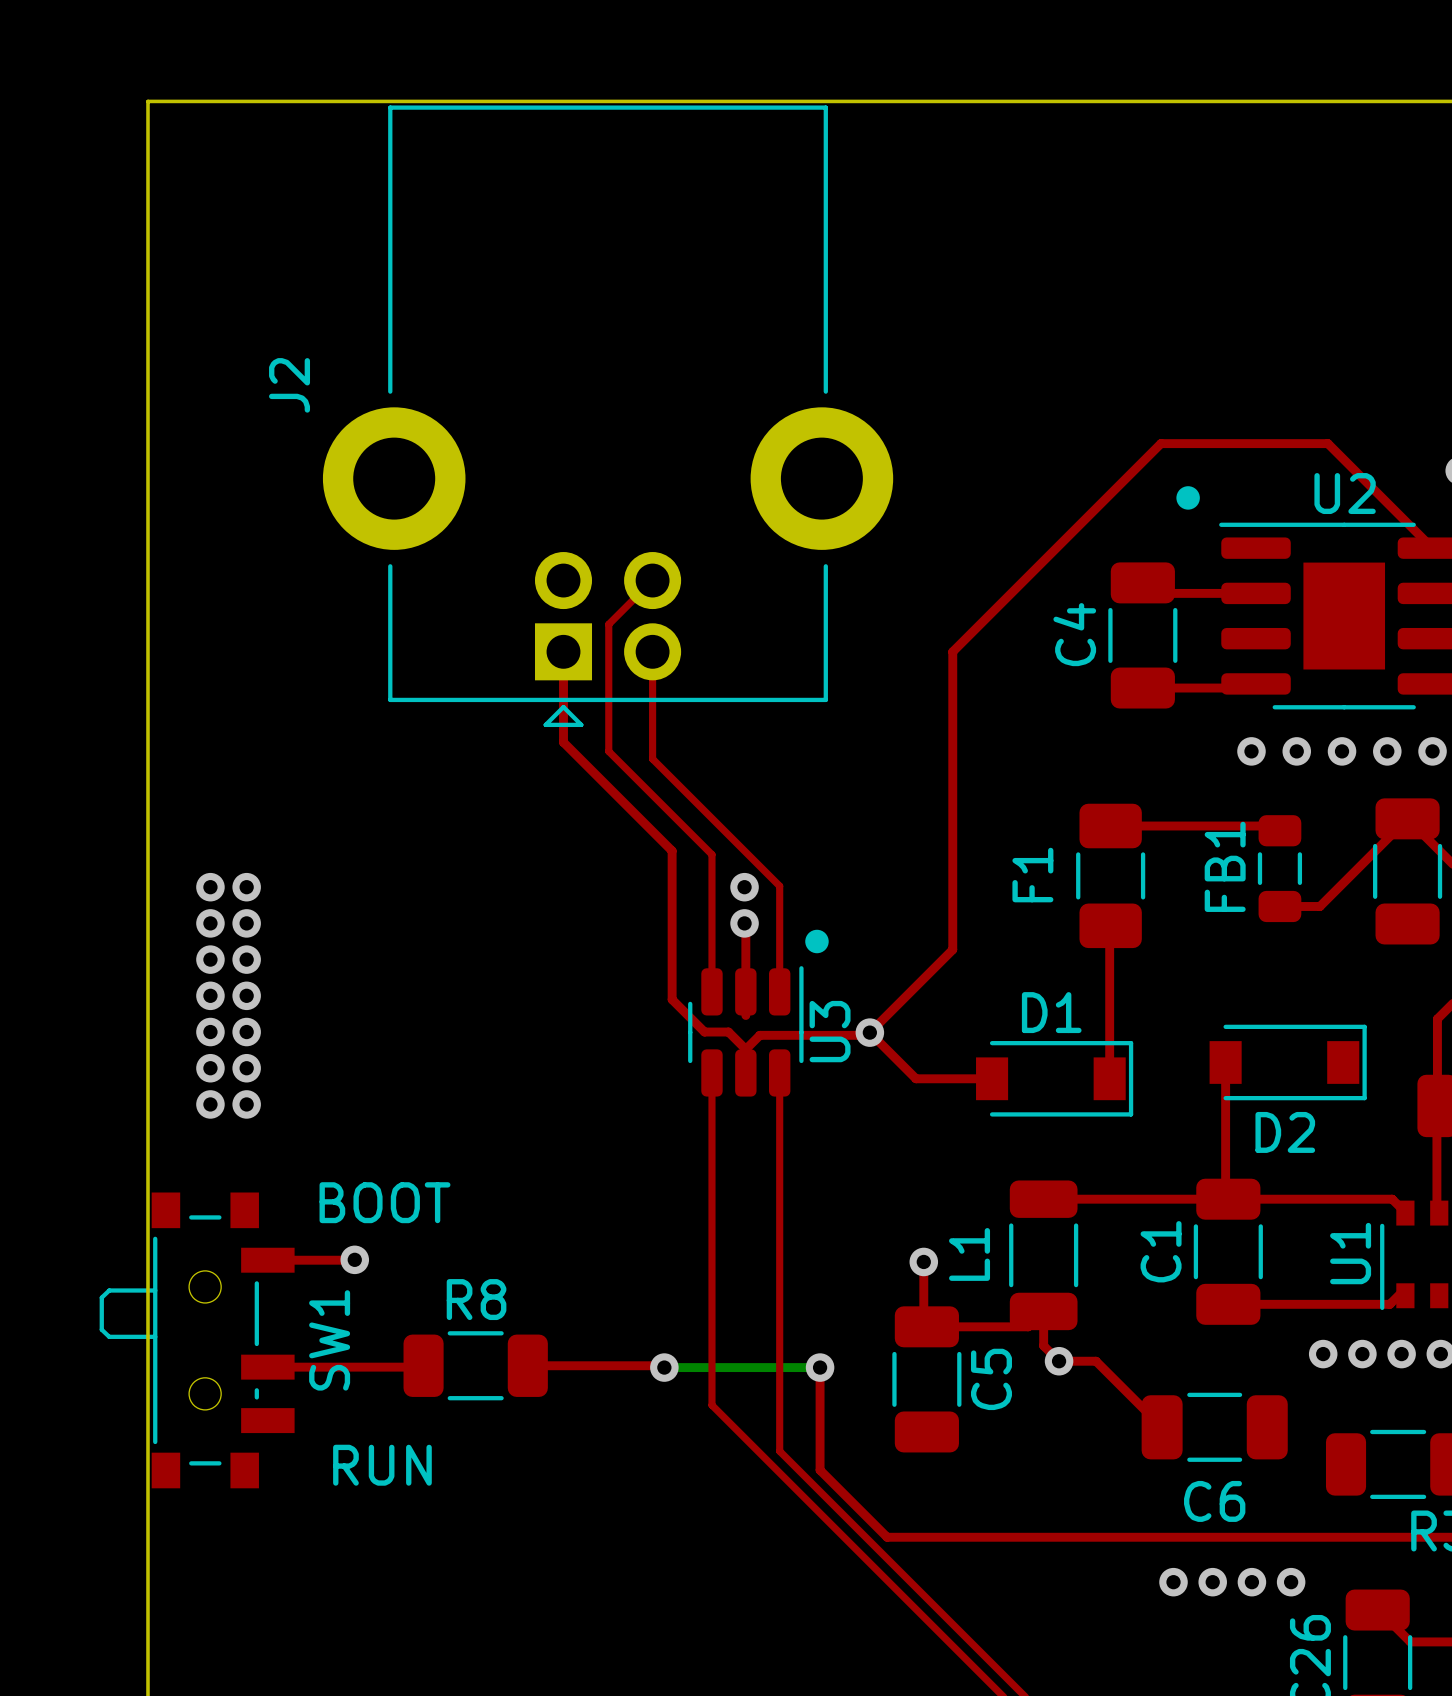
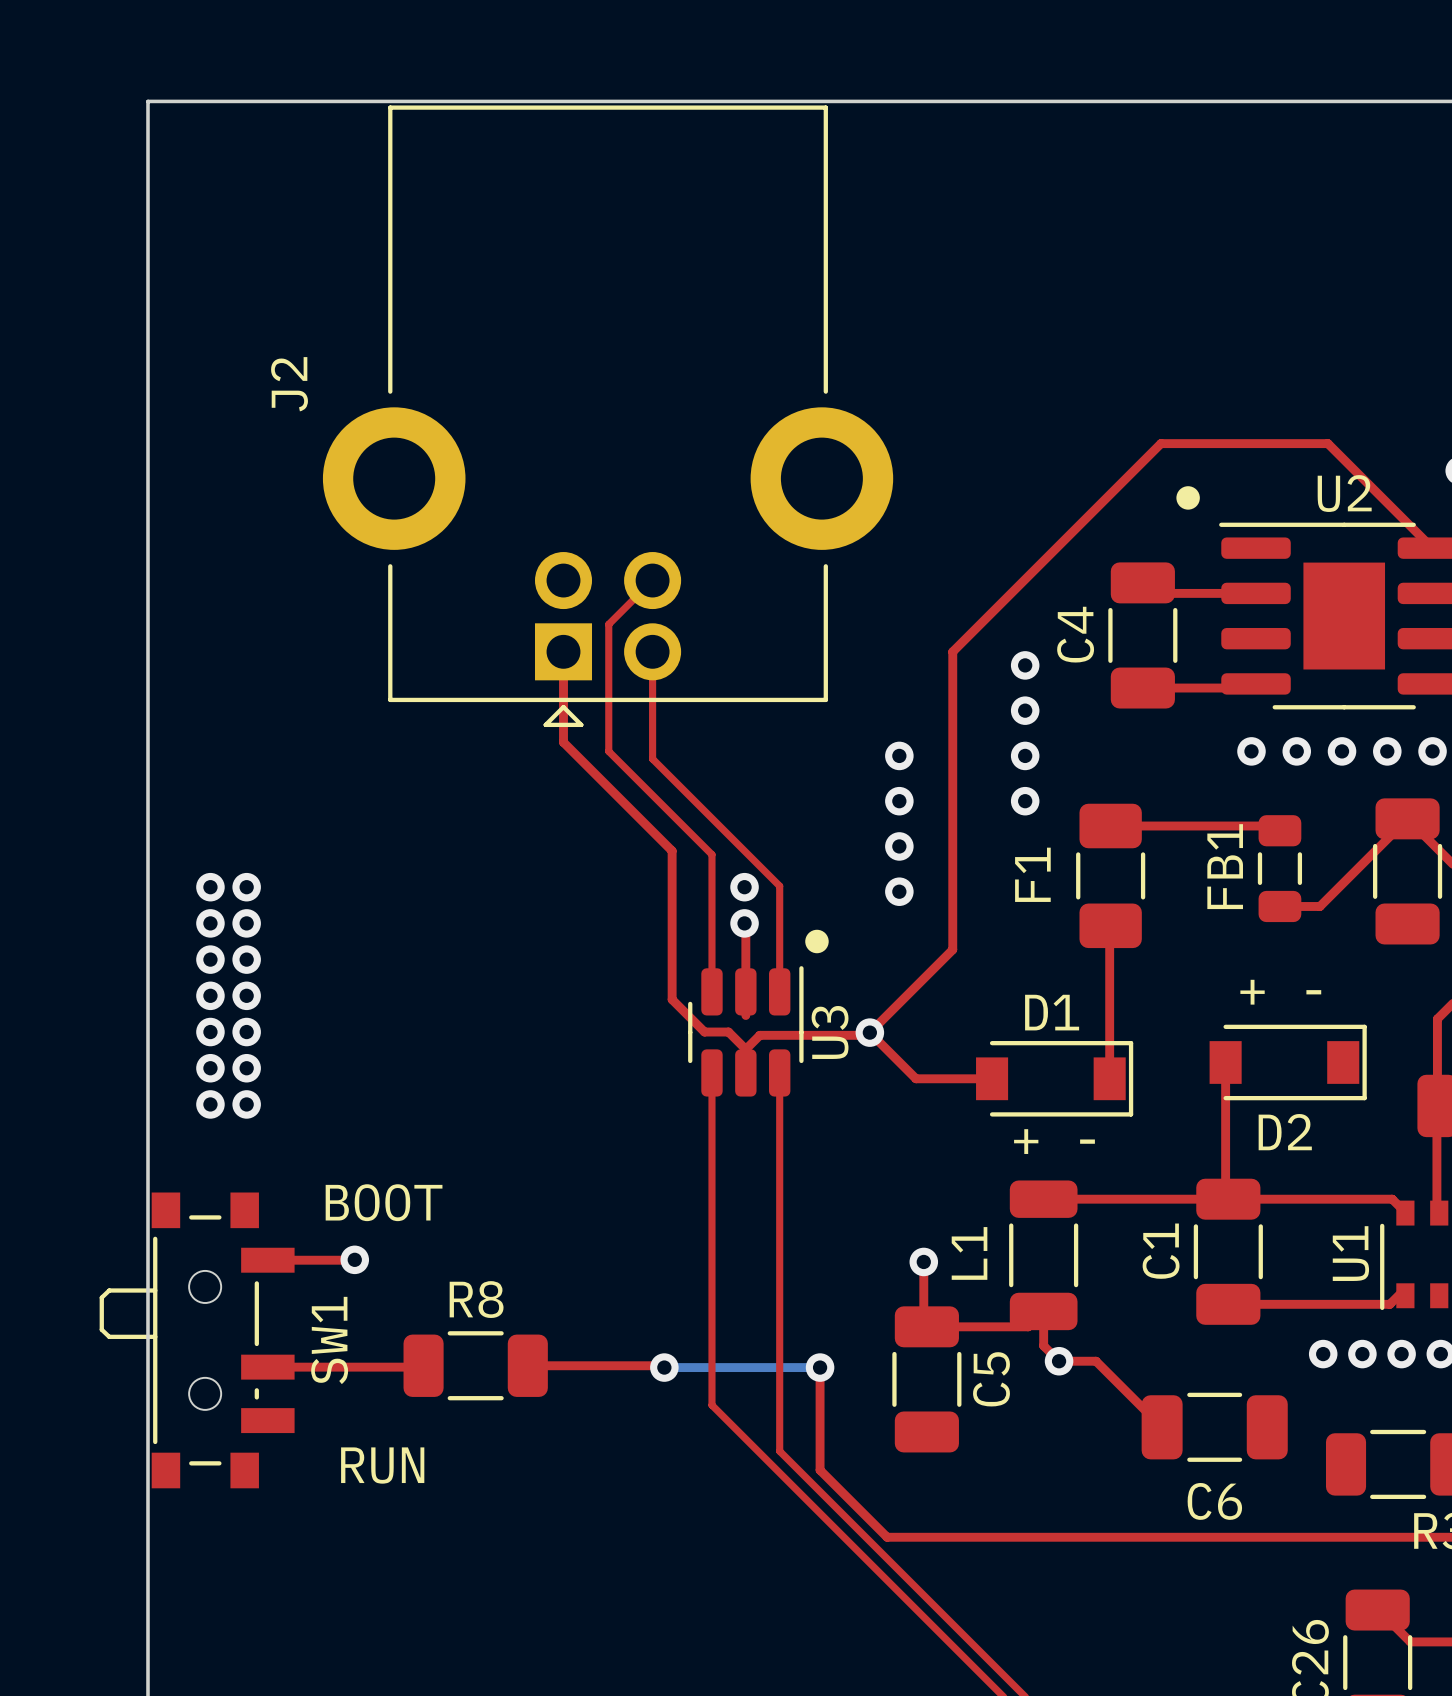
via: none -> (1025, 665)
via: none -> (1025, 710)
via: none -> (899, 755)
via: none -> (1025, 755)
via: none -> (899, 801)
via: none -> (1025, 801)
via: none -> (899, 846)
via: none -> (899, 891)
text: none -> + - (1280, 992)
text: none -> + - (1054, 1141)
via: (1173, 1582) -> none
via: (1212, 1582) -> none
via: (1251, 1582) -> none
via: (1291, 1582) -> none

